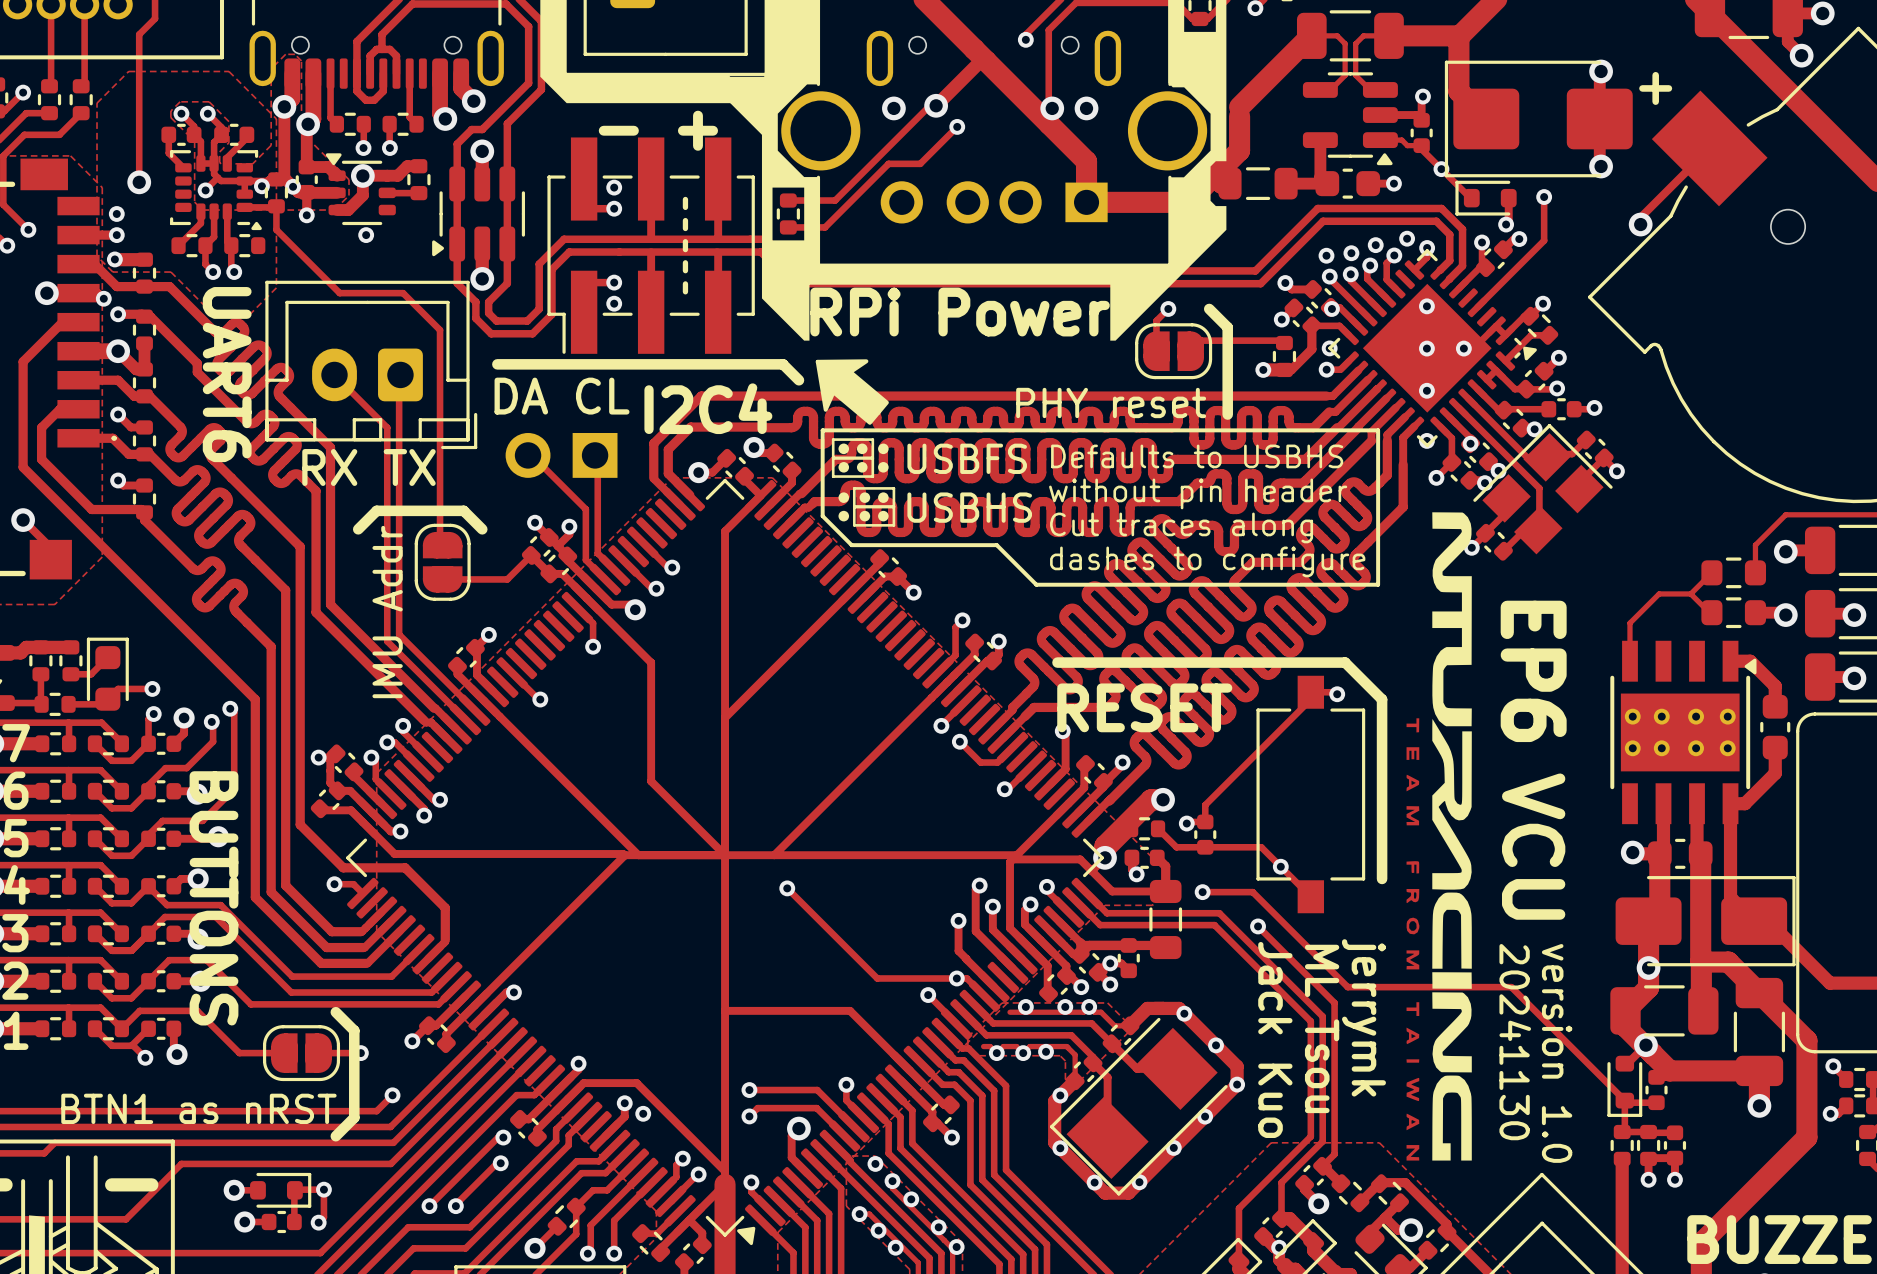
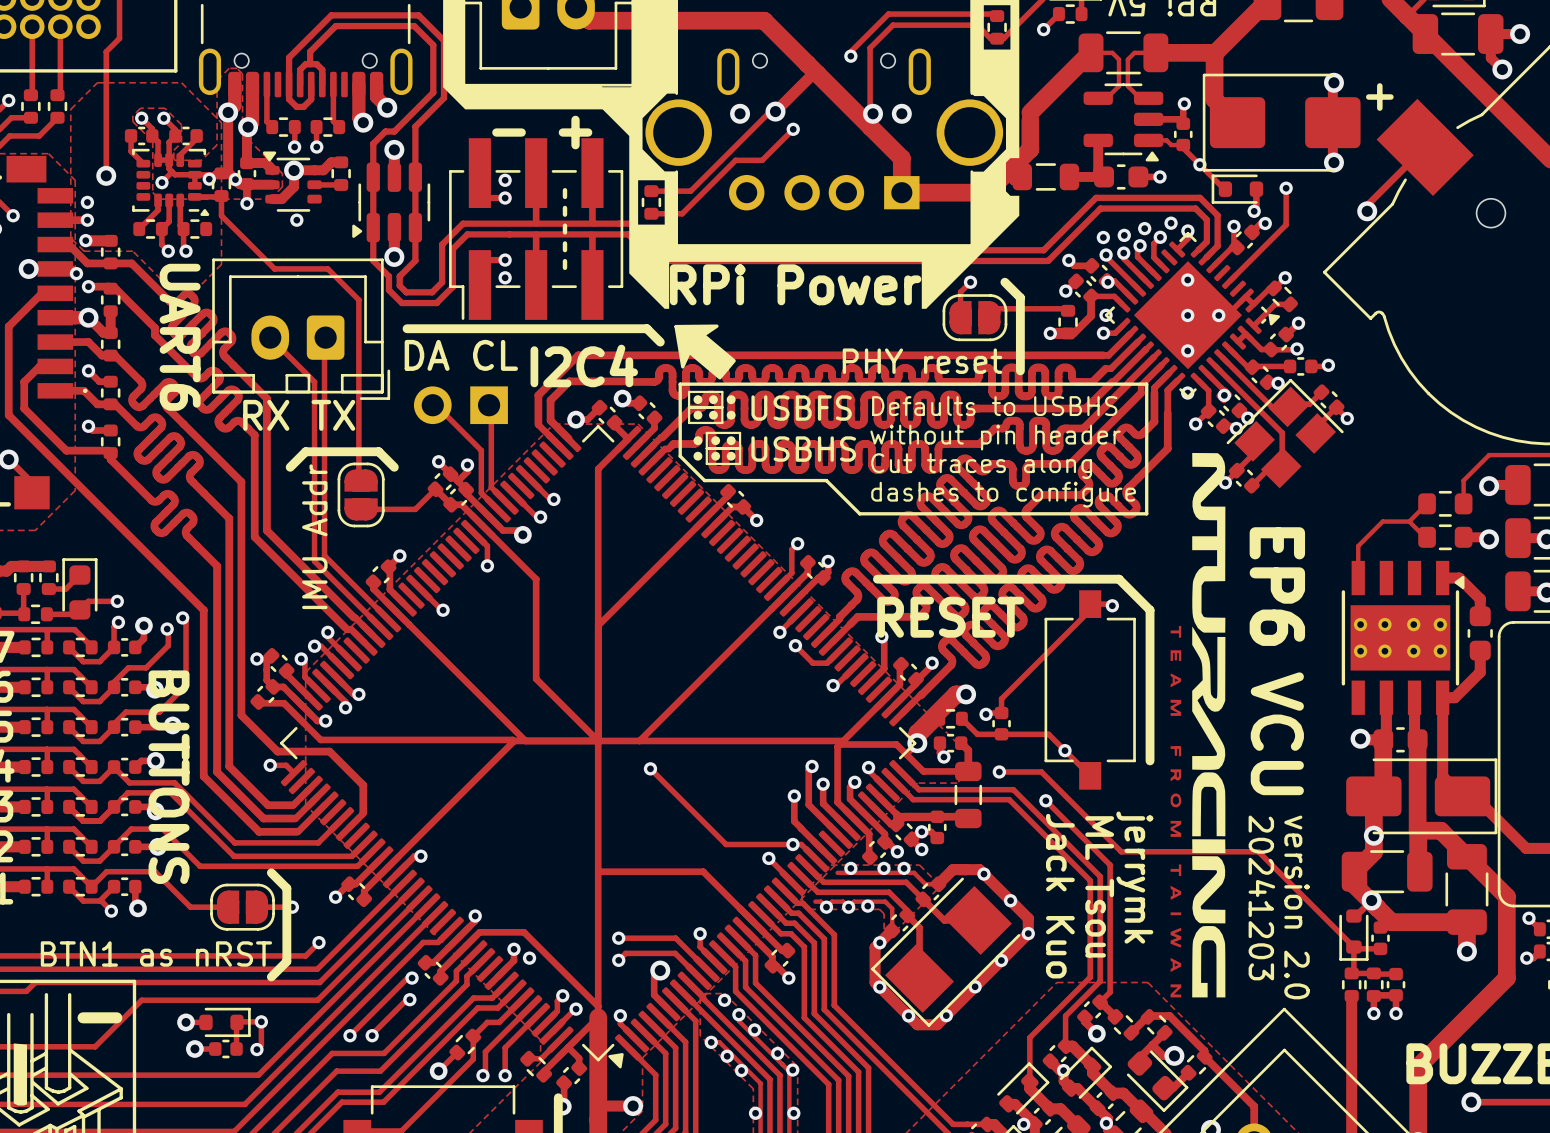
text: 20241130 (1515, 1042) -> 20241203 (1261, 897)
text: version 1.0 (1557, 1053) -> version 2.0 (1297, 907)

